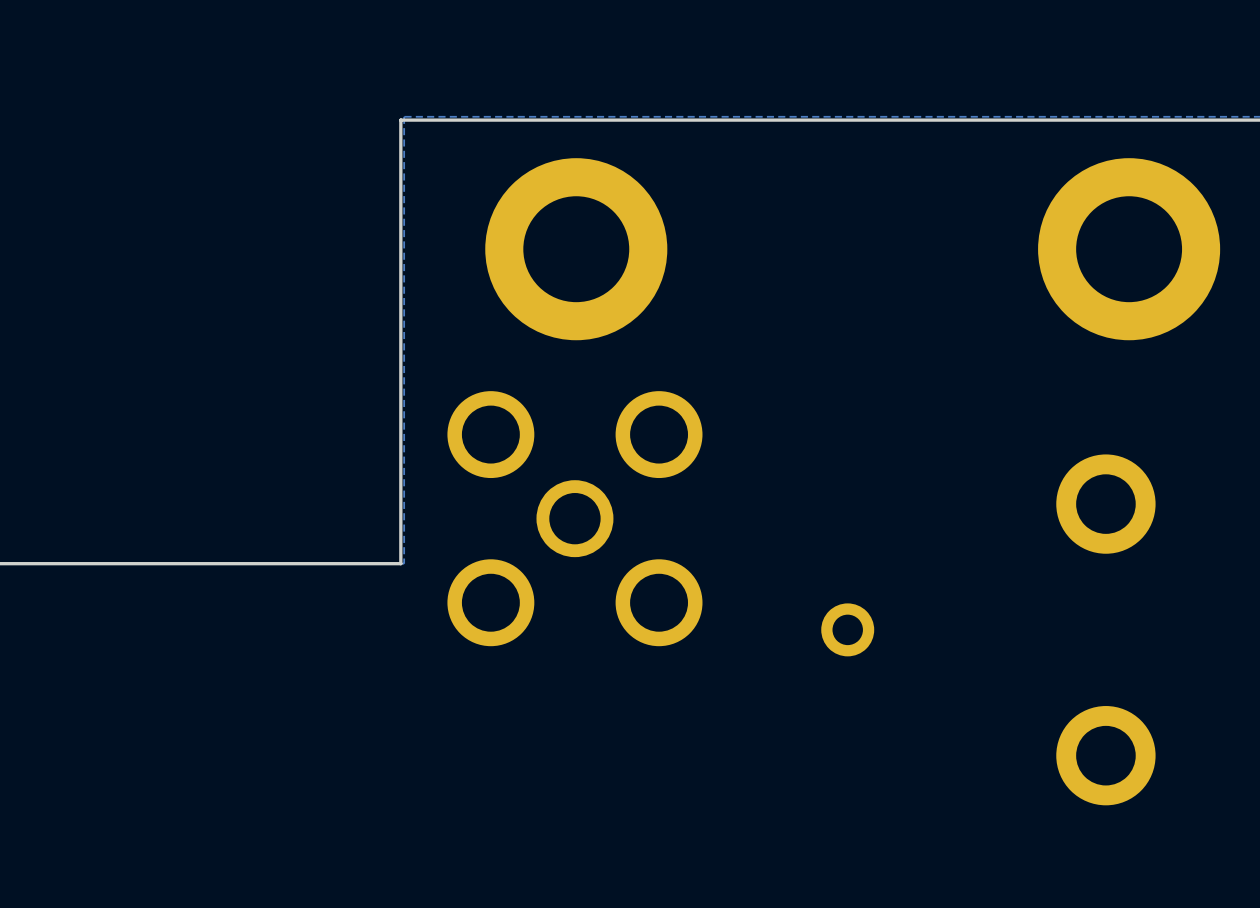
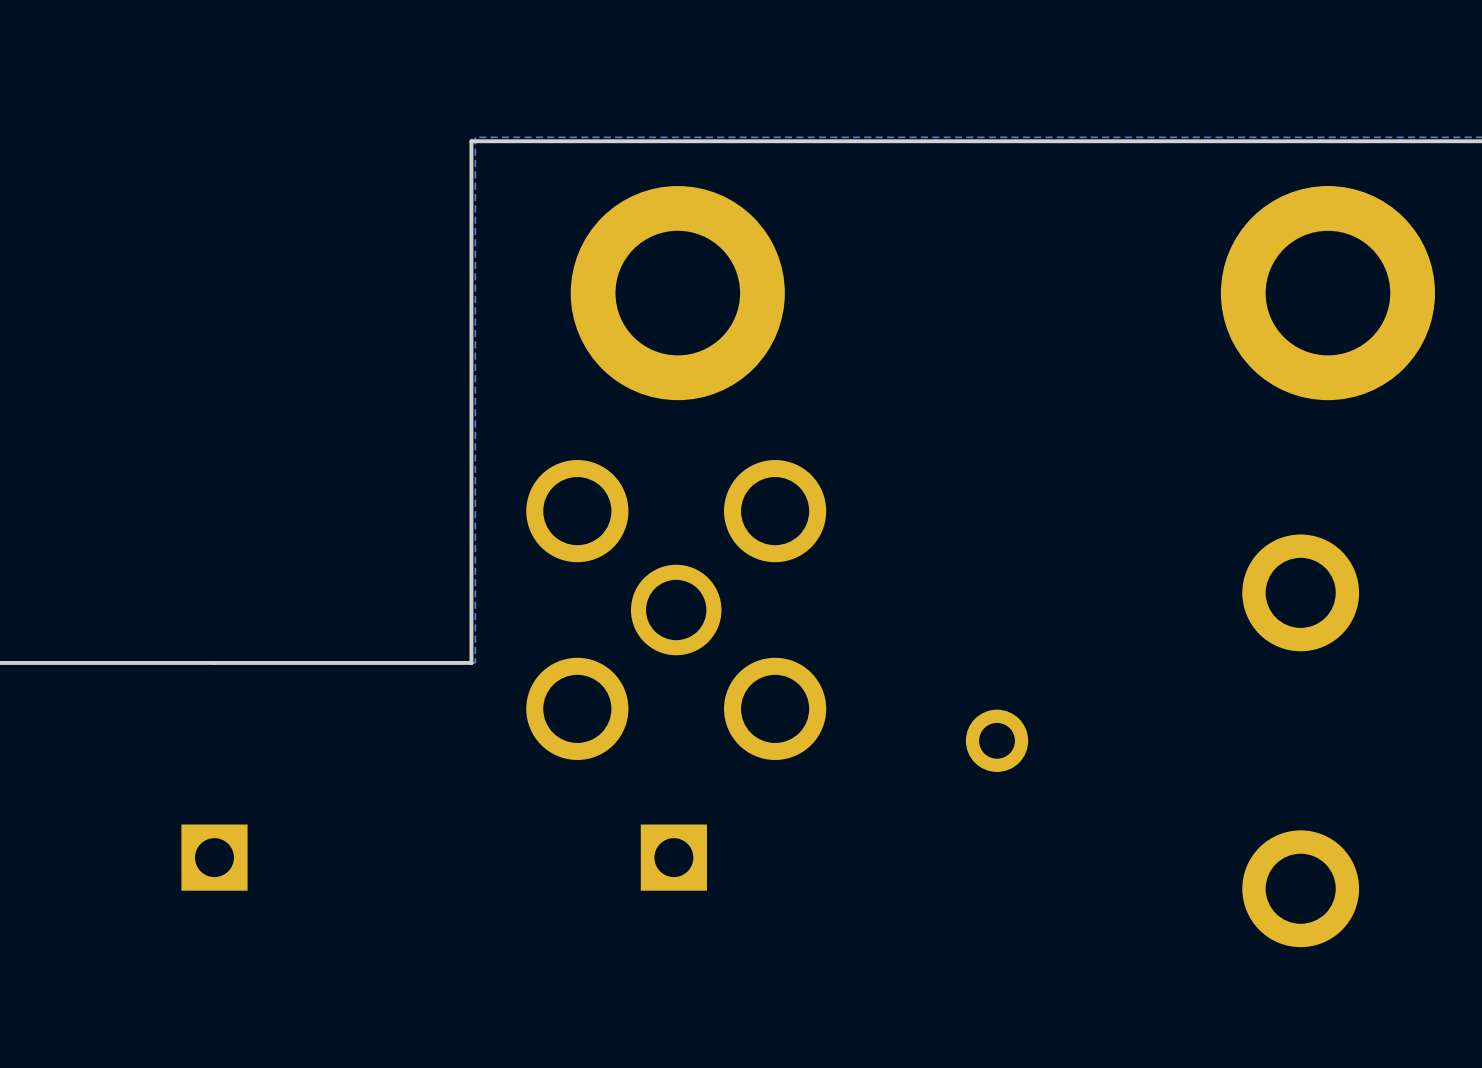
part: none -> (214, 857)
part: none -> (673, 857)

